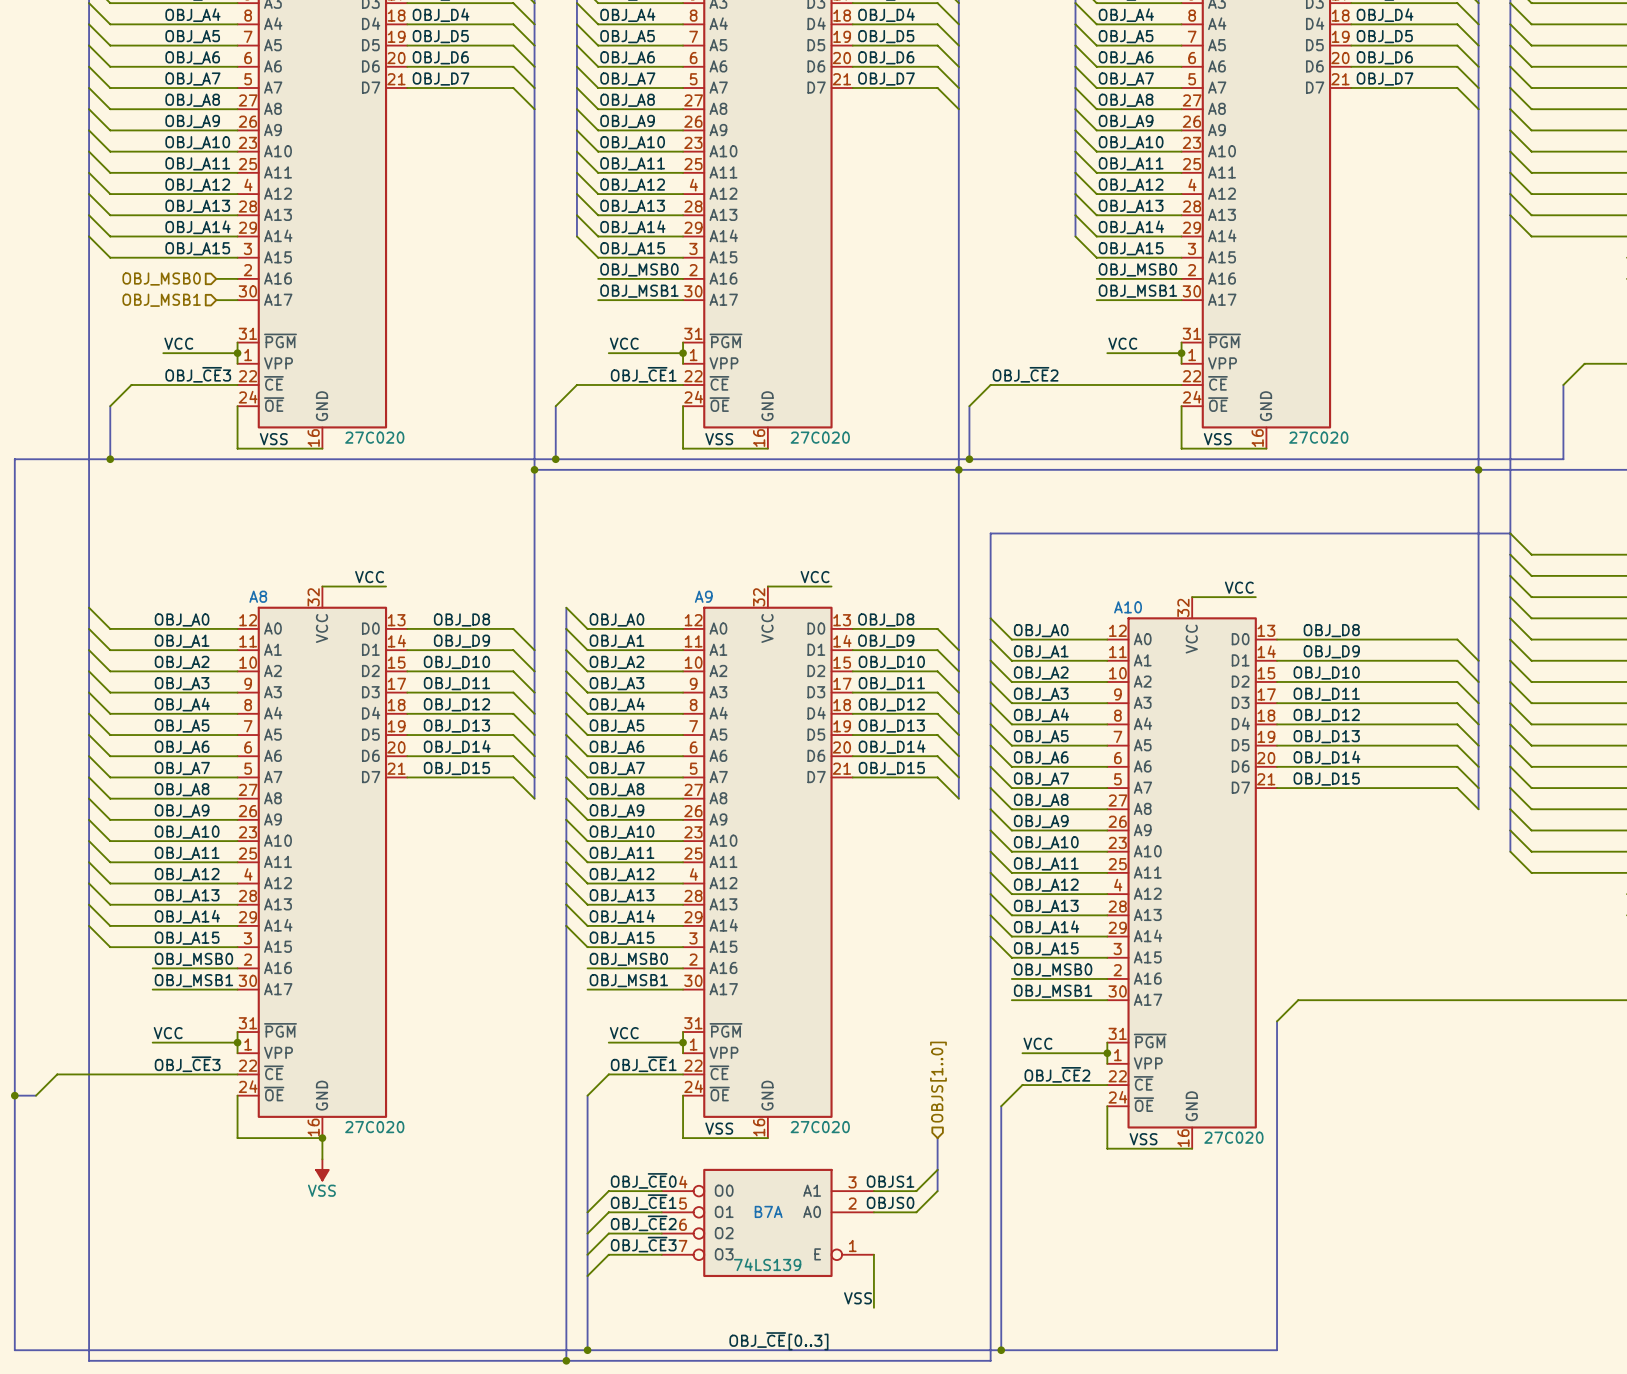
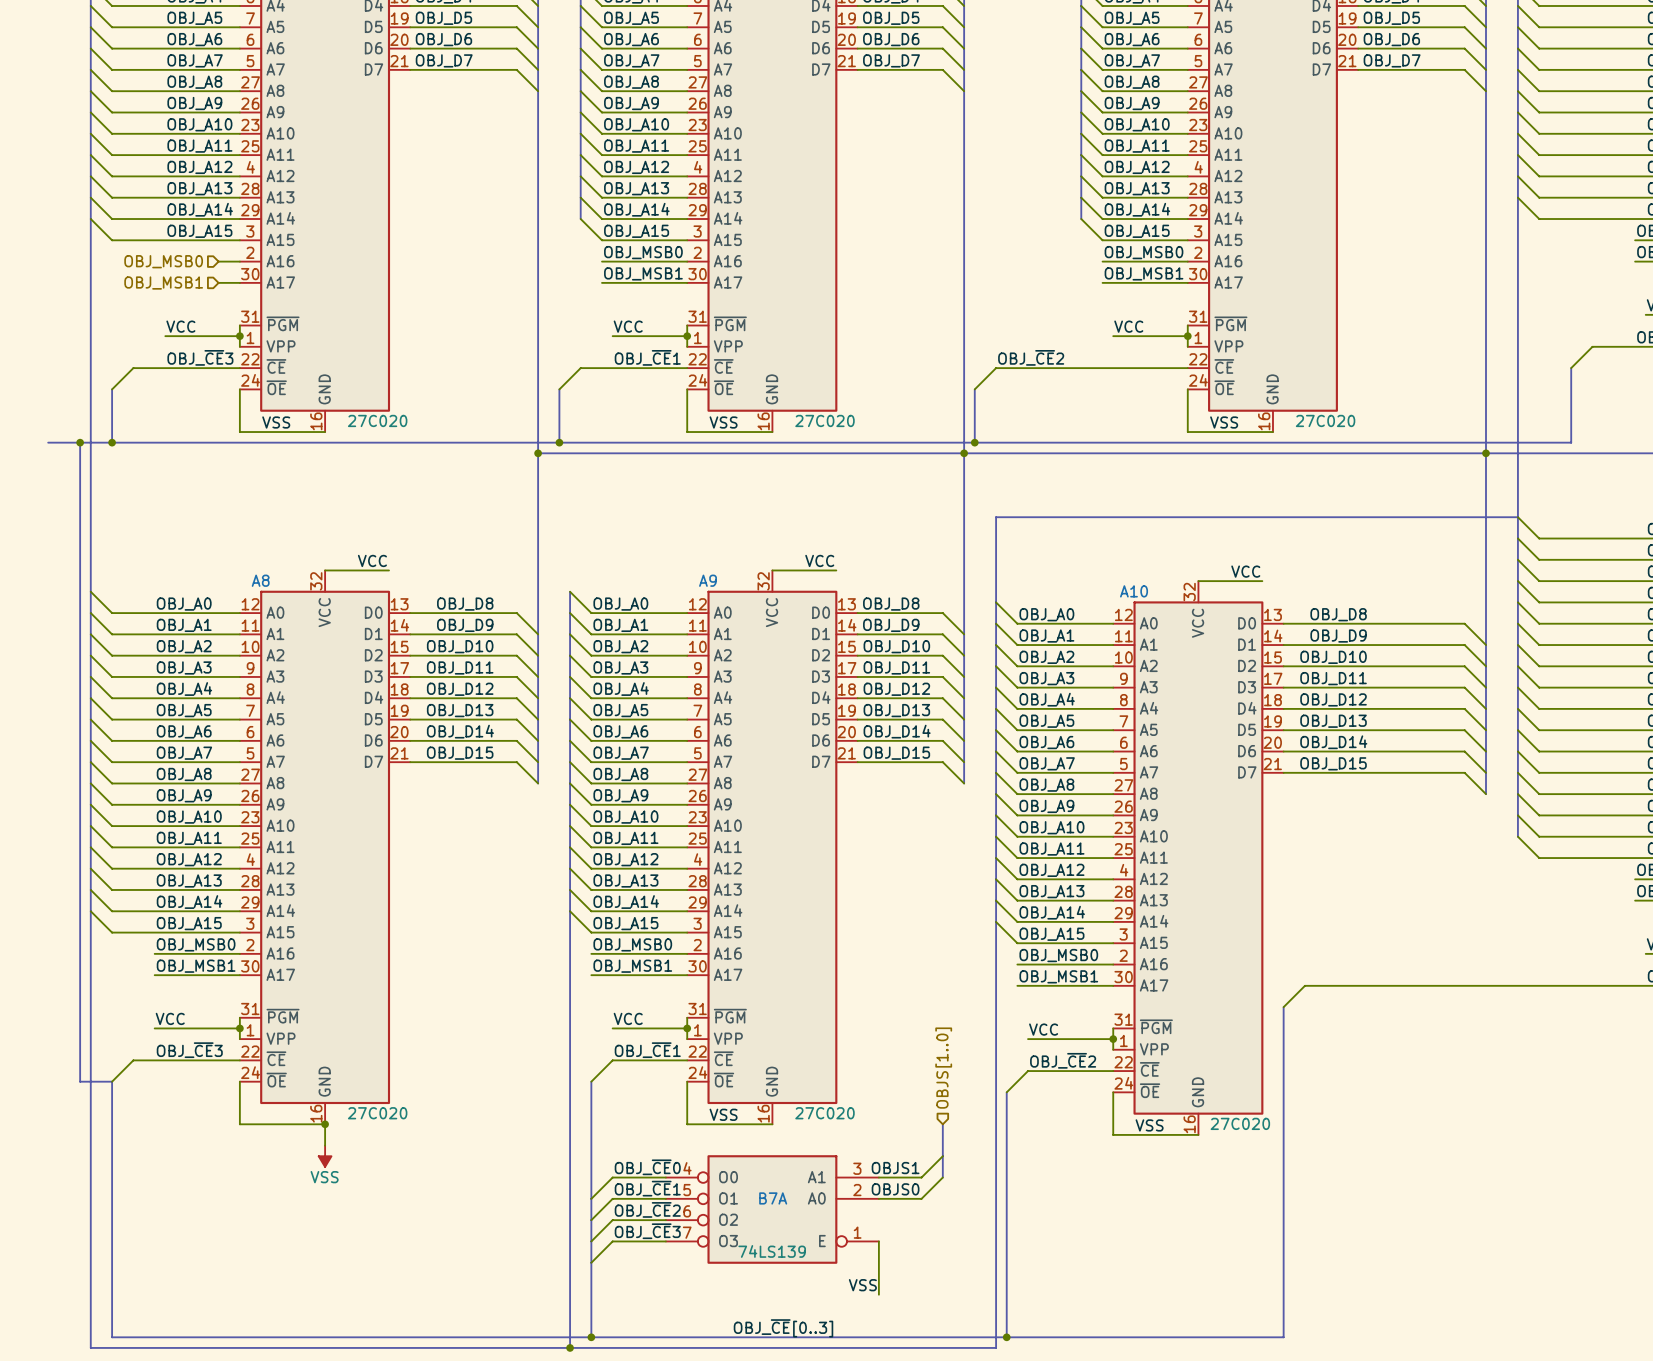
bus: (46, 459) (14, 459) (14, 1350) (110, 1350) -> (80, 442) (80, 1081) (112, 1081) (112, 1337)
junction: none -> (80, 442)
wire: (131, 1074) (57, 1074) (36, 1095) -> (133, 1060) (112, 1081)
bus: (14, 1095) (36, 1095) -> none
junction: (14, 1095) -> none

